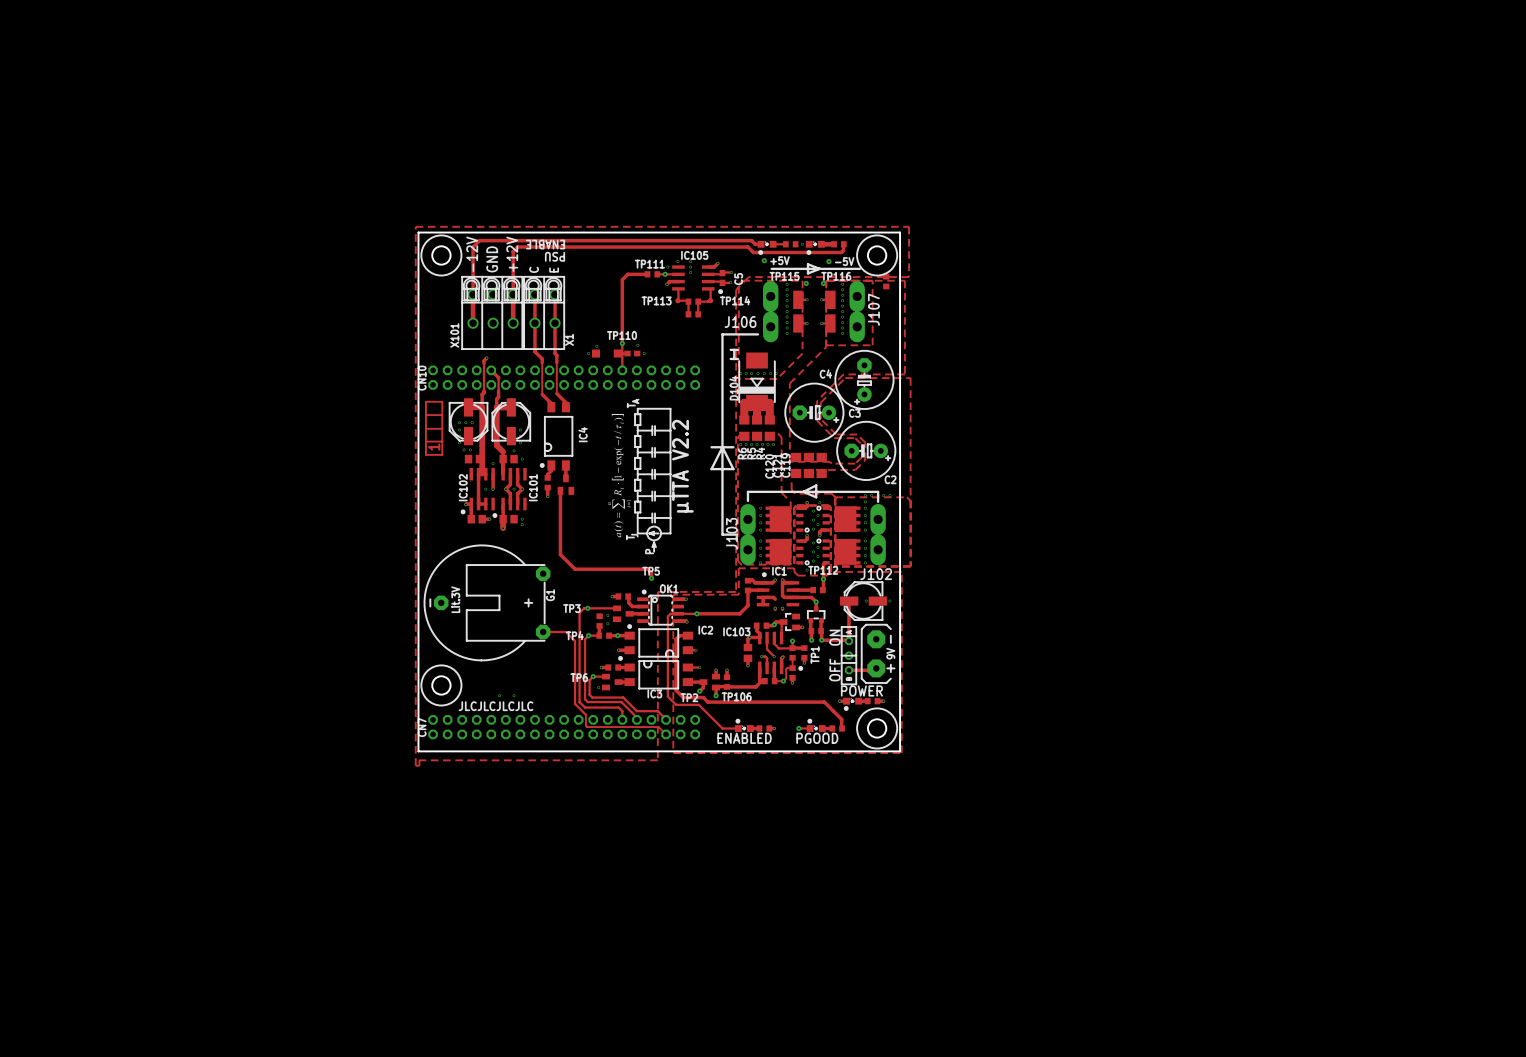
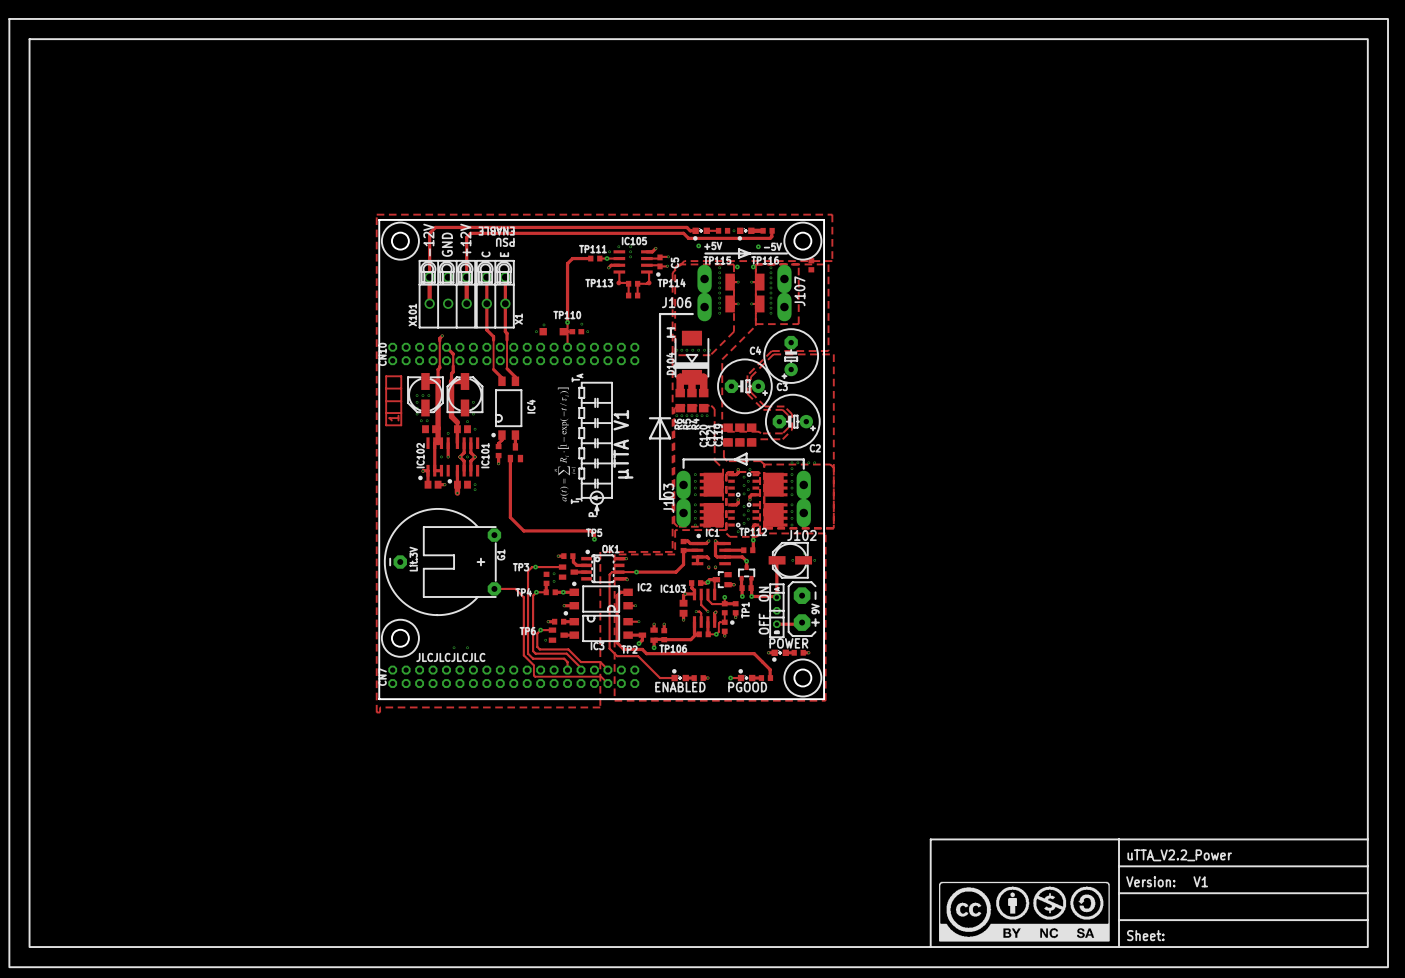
drawing: none -> [9, 18, 1389, 968]
text: µTTA V2.2 (682, 466) -> µTTA V1 (623, 444)

